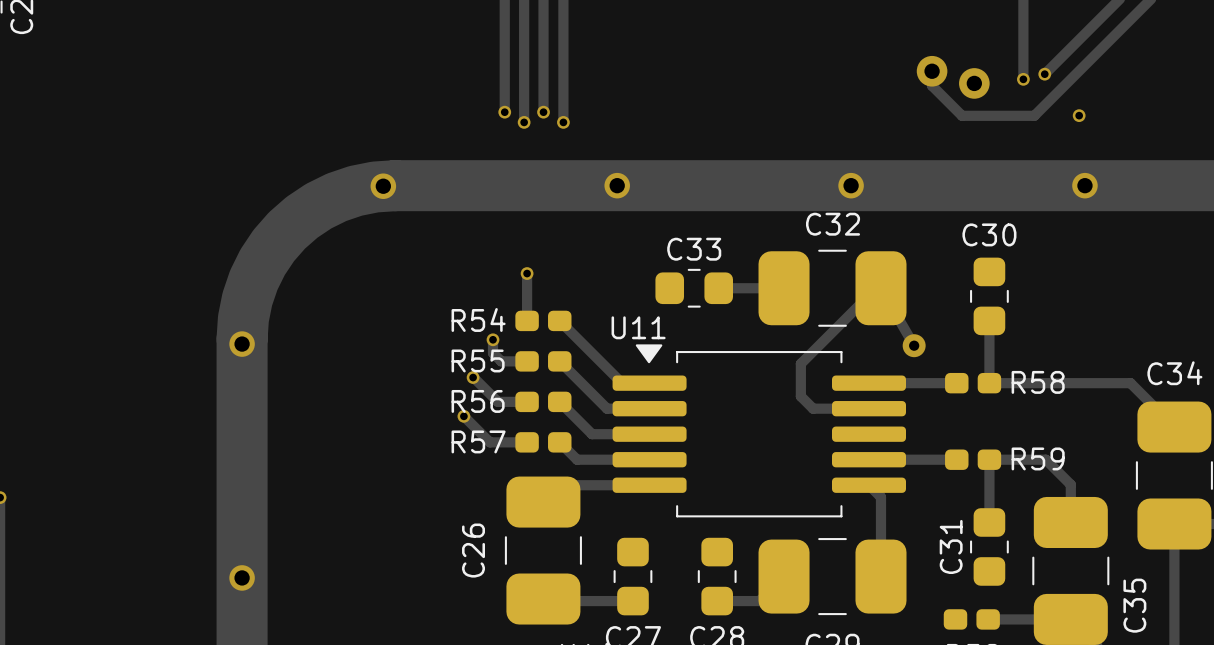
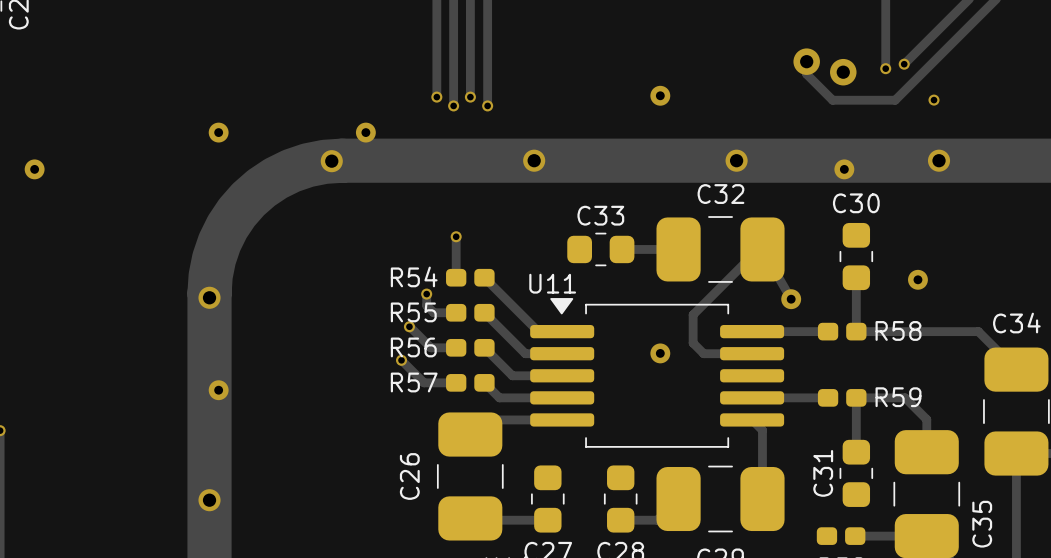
via: none -> (660, 95)
via: none -> (218, 132)
via: none -> (365, 132)
via: none -> (34, 169)
via: none -> (844, 169)
via: none -> (917, 279)
via: none -> (660, 353)
via: none -> (218, 390)

